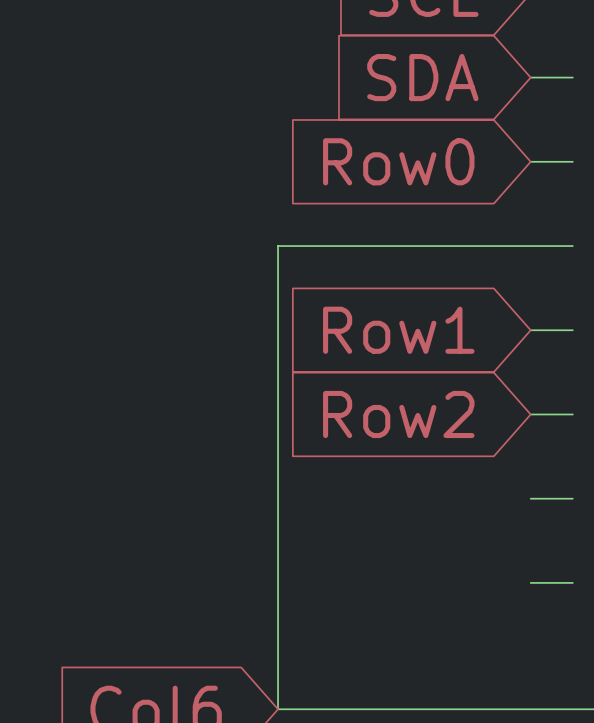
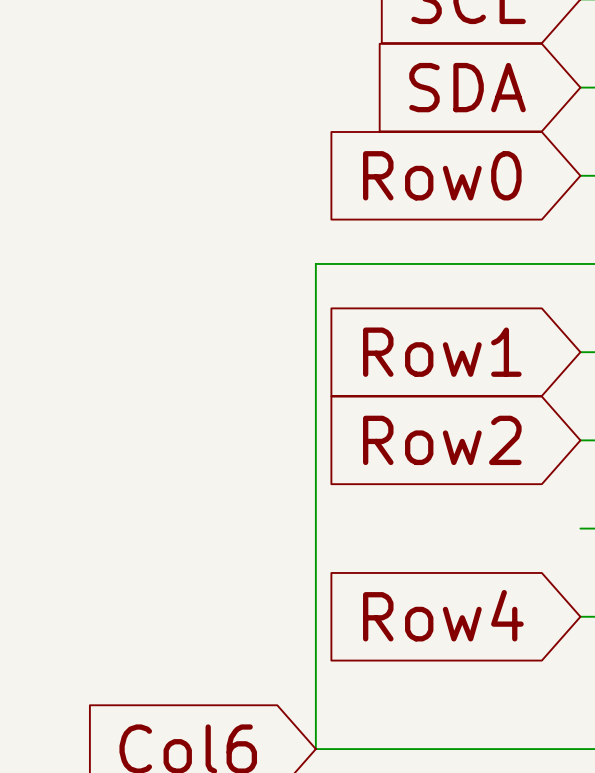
global label: none -> Row4 (443, 615)

